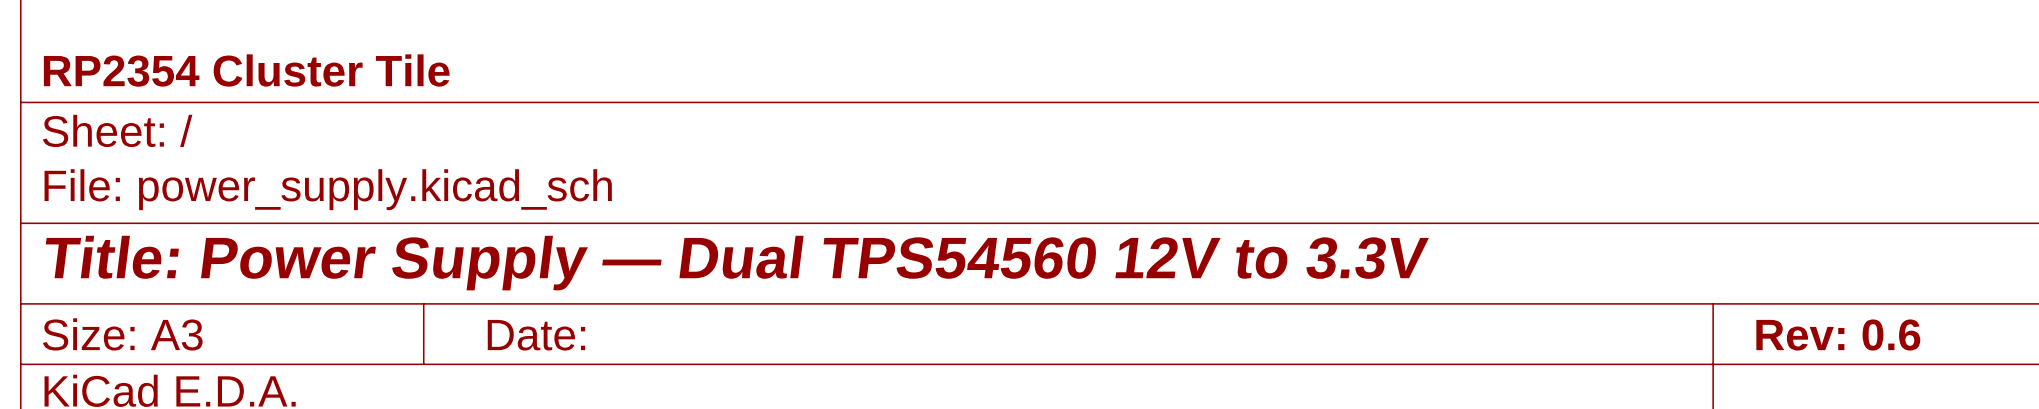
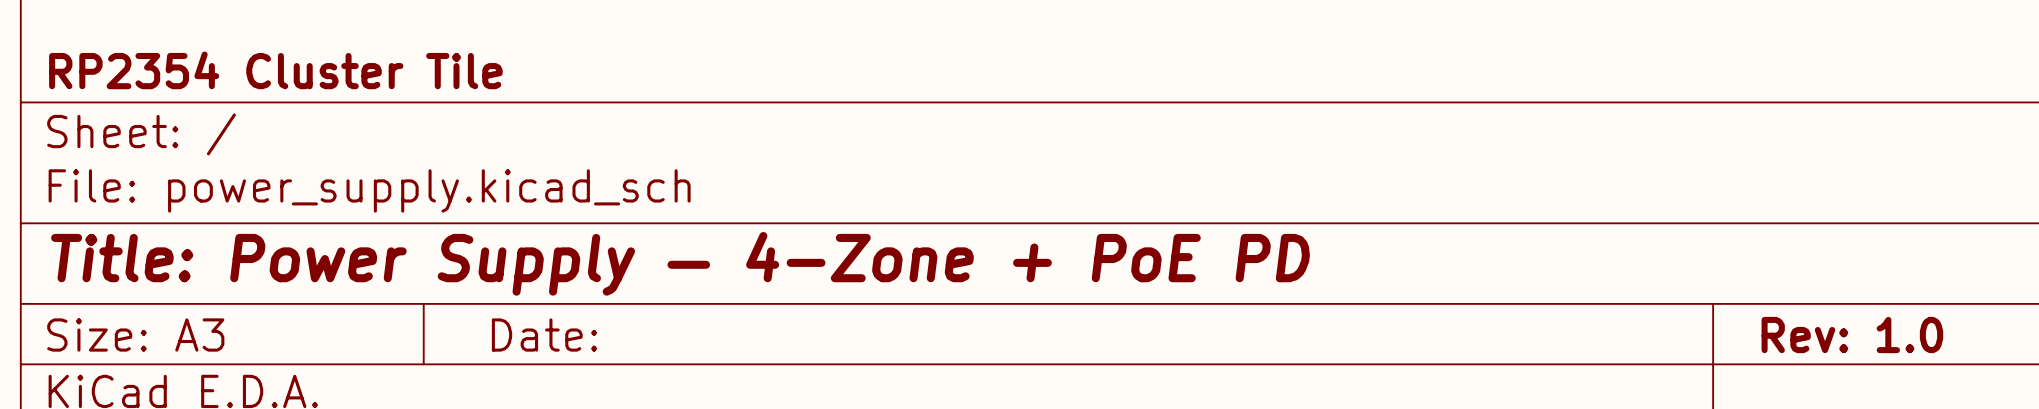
title block: Title: Power Supply — Dual TPS54560 12V to 3.3V (737, 263) -> Title: Power Supply — 4-Zone + PoE PD (680, 263)
title block: Rev: 0.6 (1838, 335) -> Rev: 1.0 (1852, 335)

